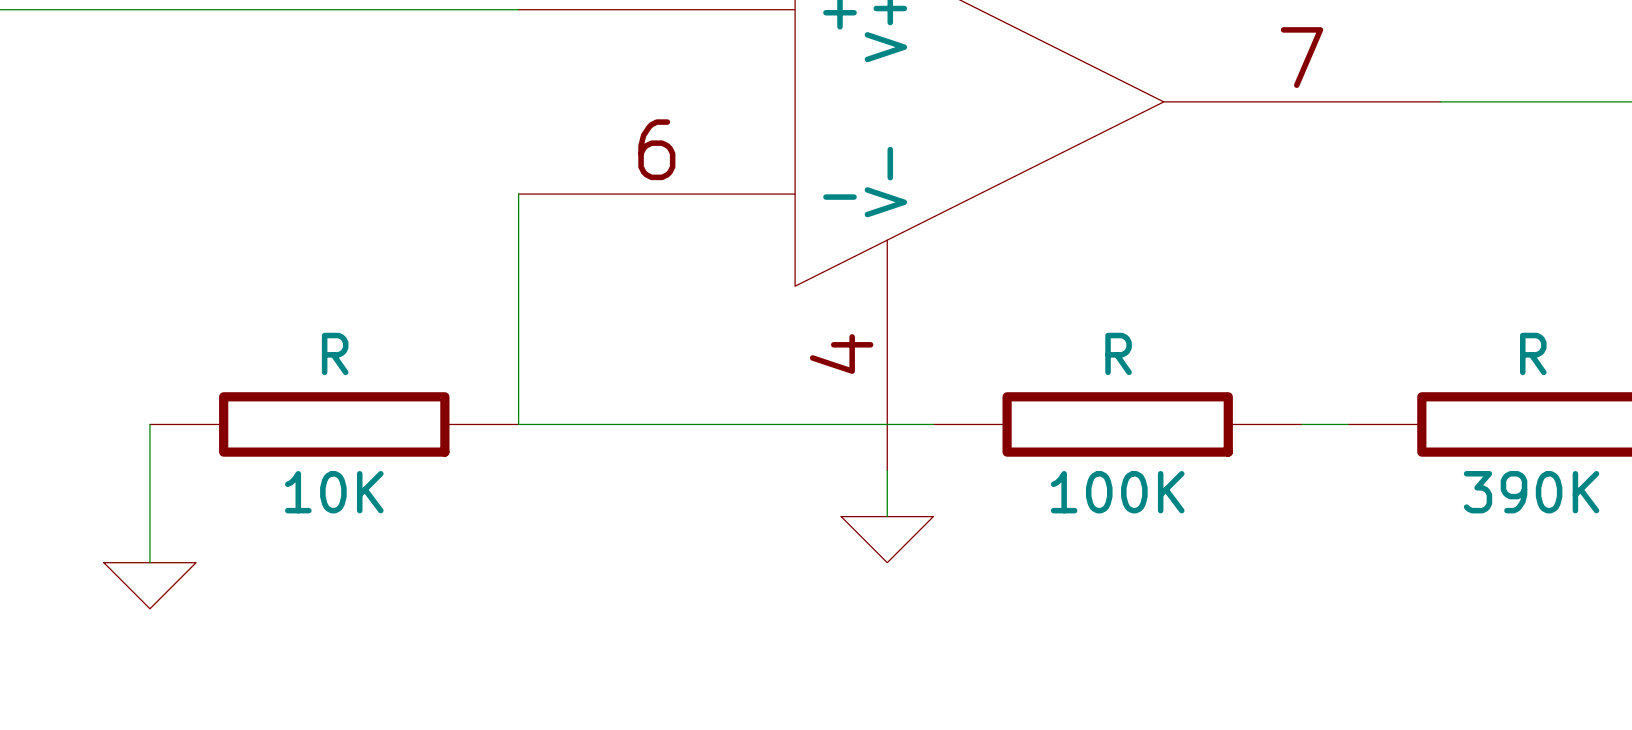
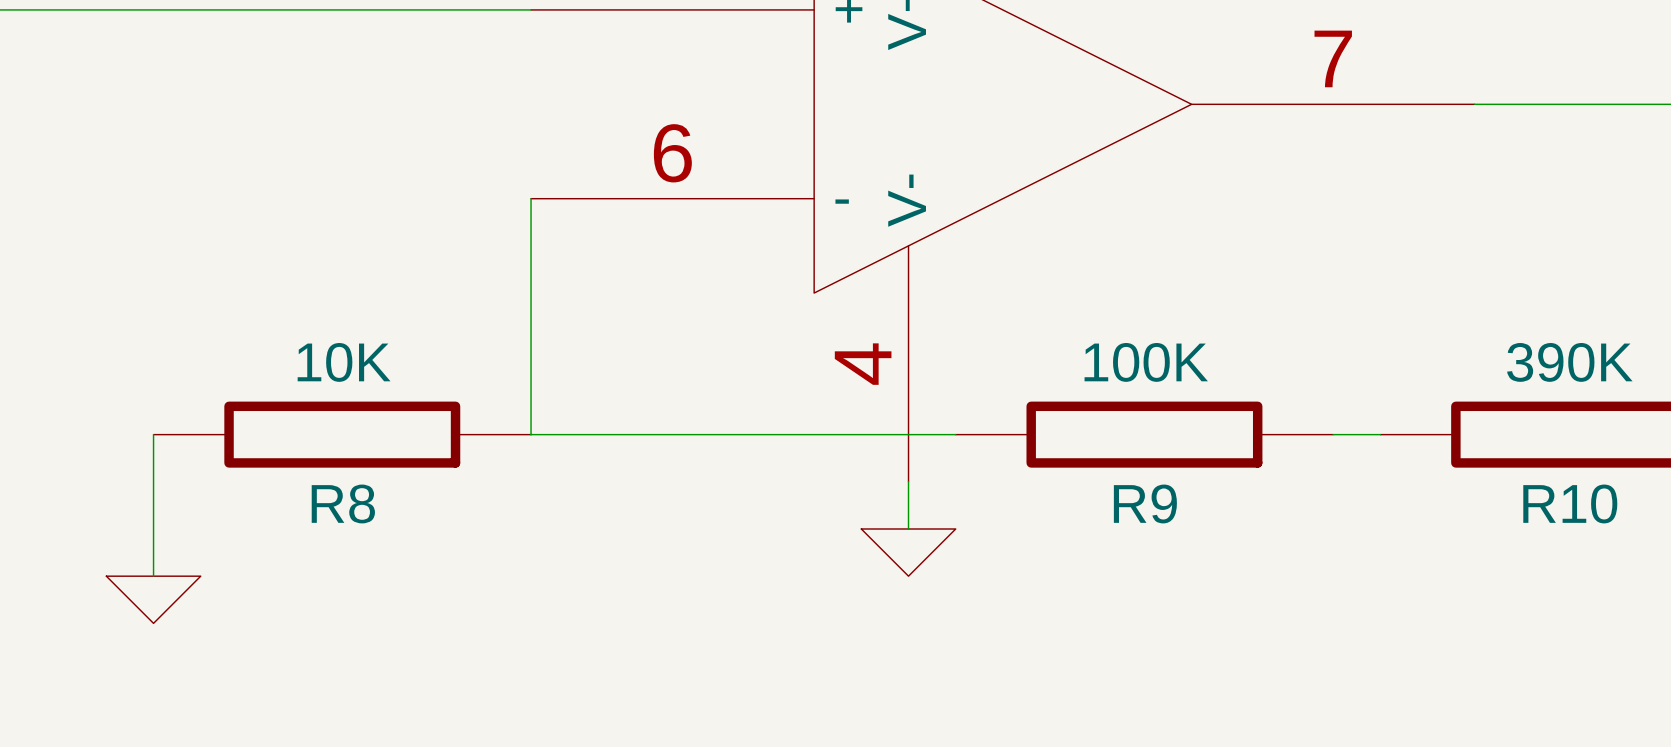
10K value: R (335, 353) -> 10K (344, 362)
100K value: R (1118, 353) -> 100K (1146, 362)
390K value: R (1533, 353) -> 390K (1569, 362)
10K name: 10K (334, 492) -> R8 (343, 503)
100K name: 100K (1117, 492) -> R9 (1145, 503)
390K name: 390K (1531, 492) -> R10 (1570, 503)

